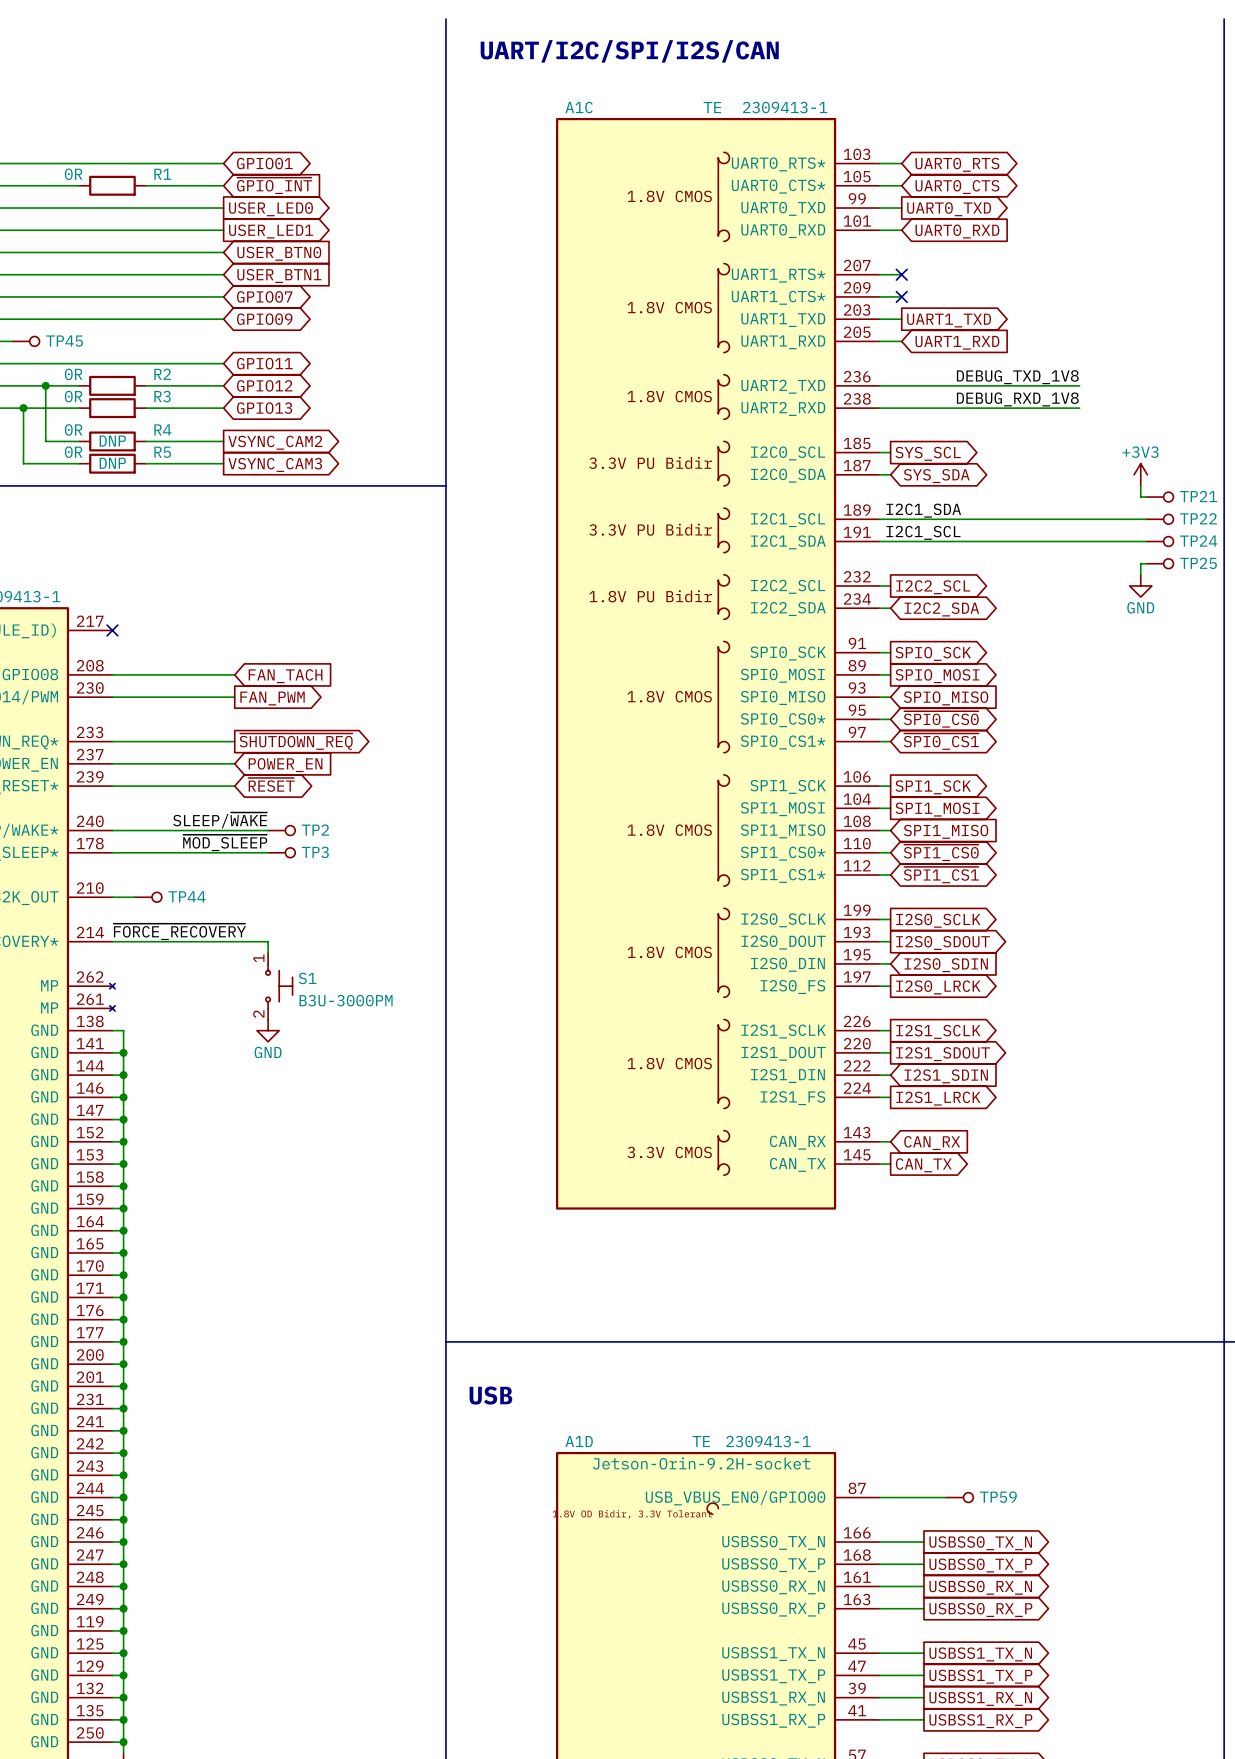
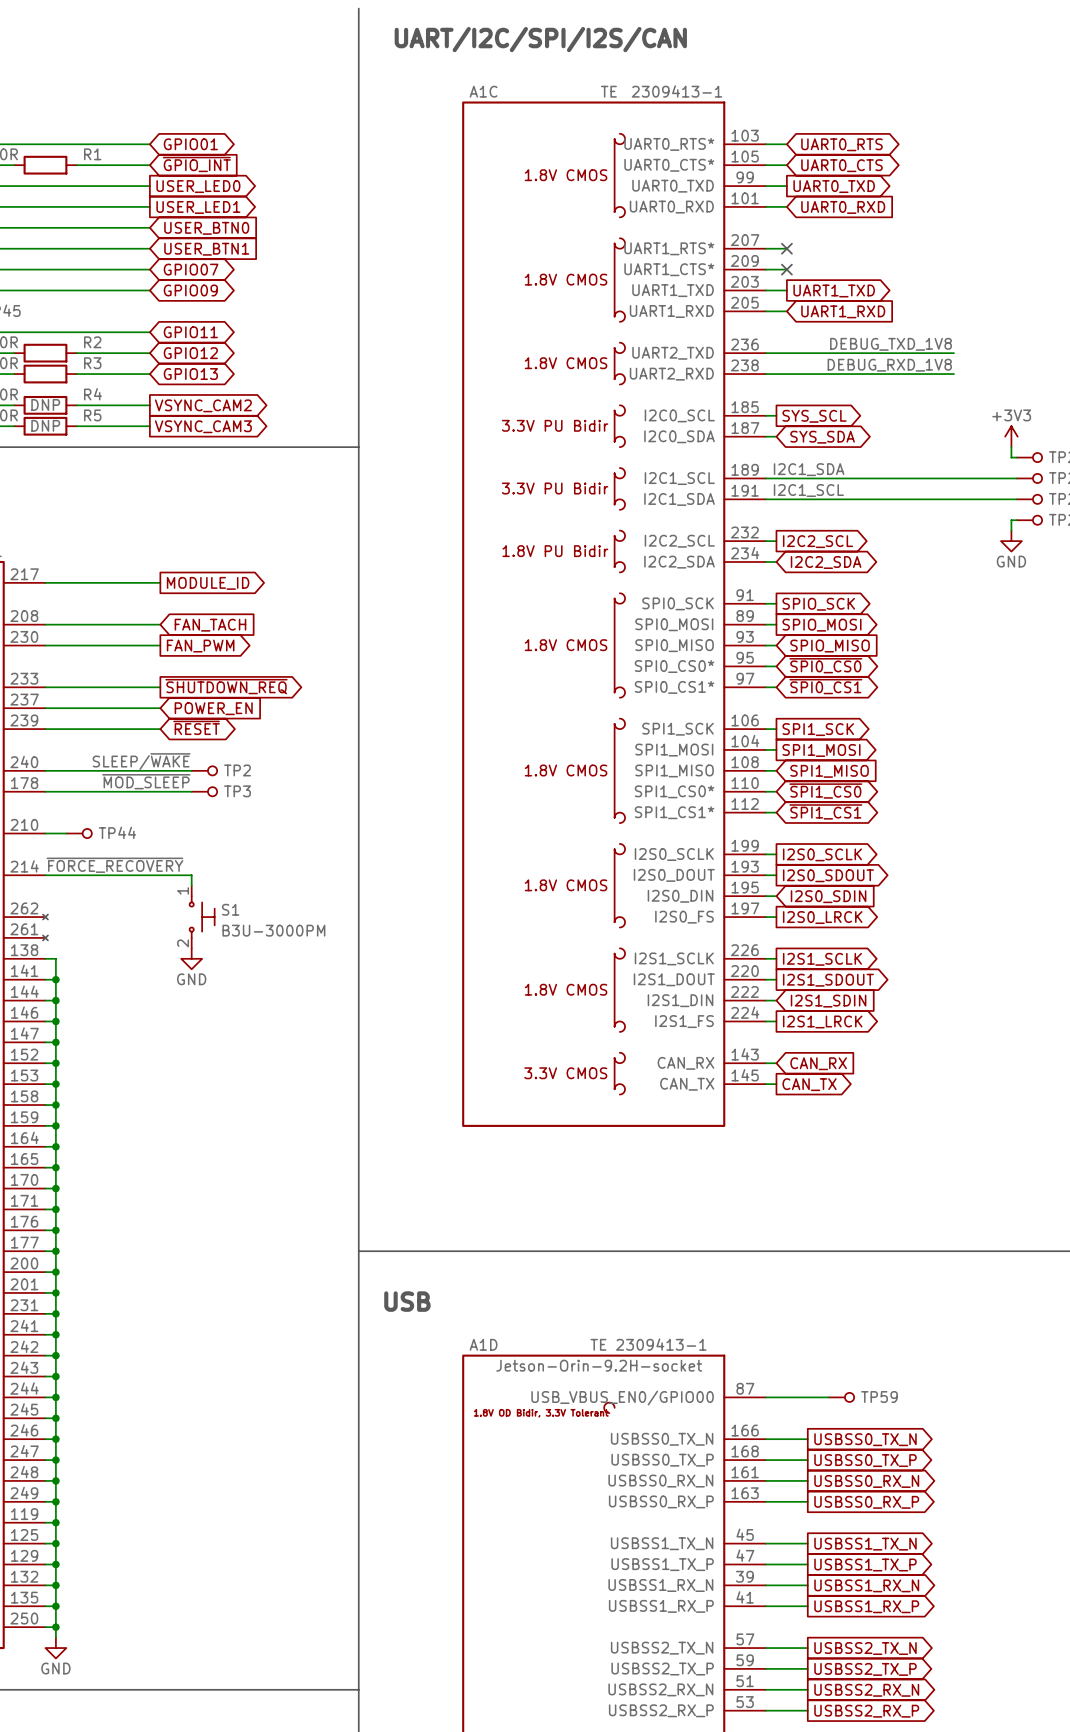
wire: none -> (45, 582) (160, 582)
no-connect mark: (112, 630) -> none
global label: none -> MODULE_ID (208, 583)

